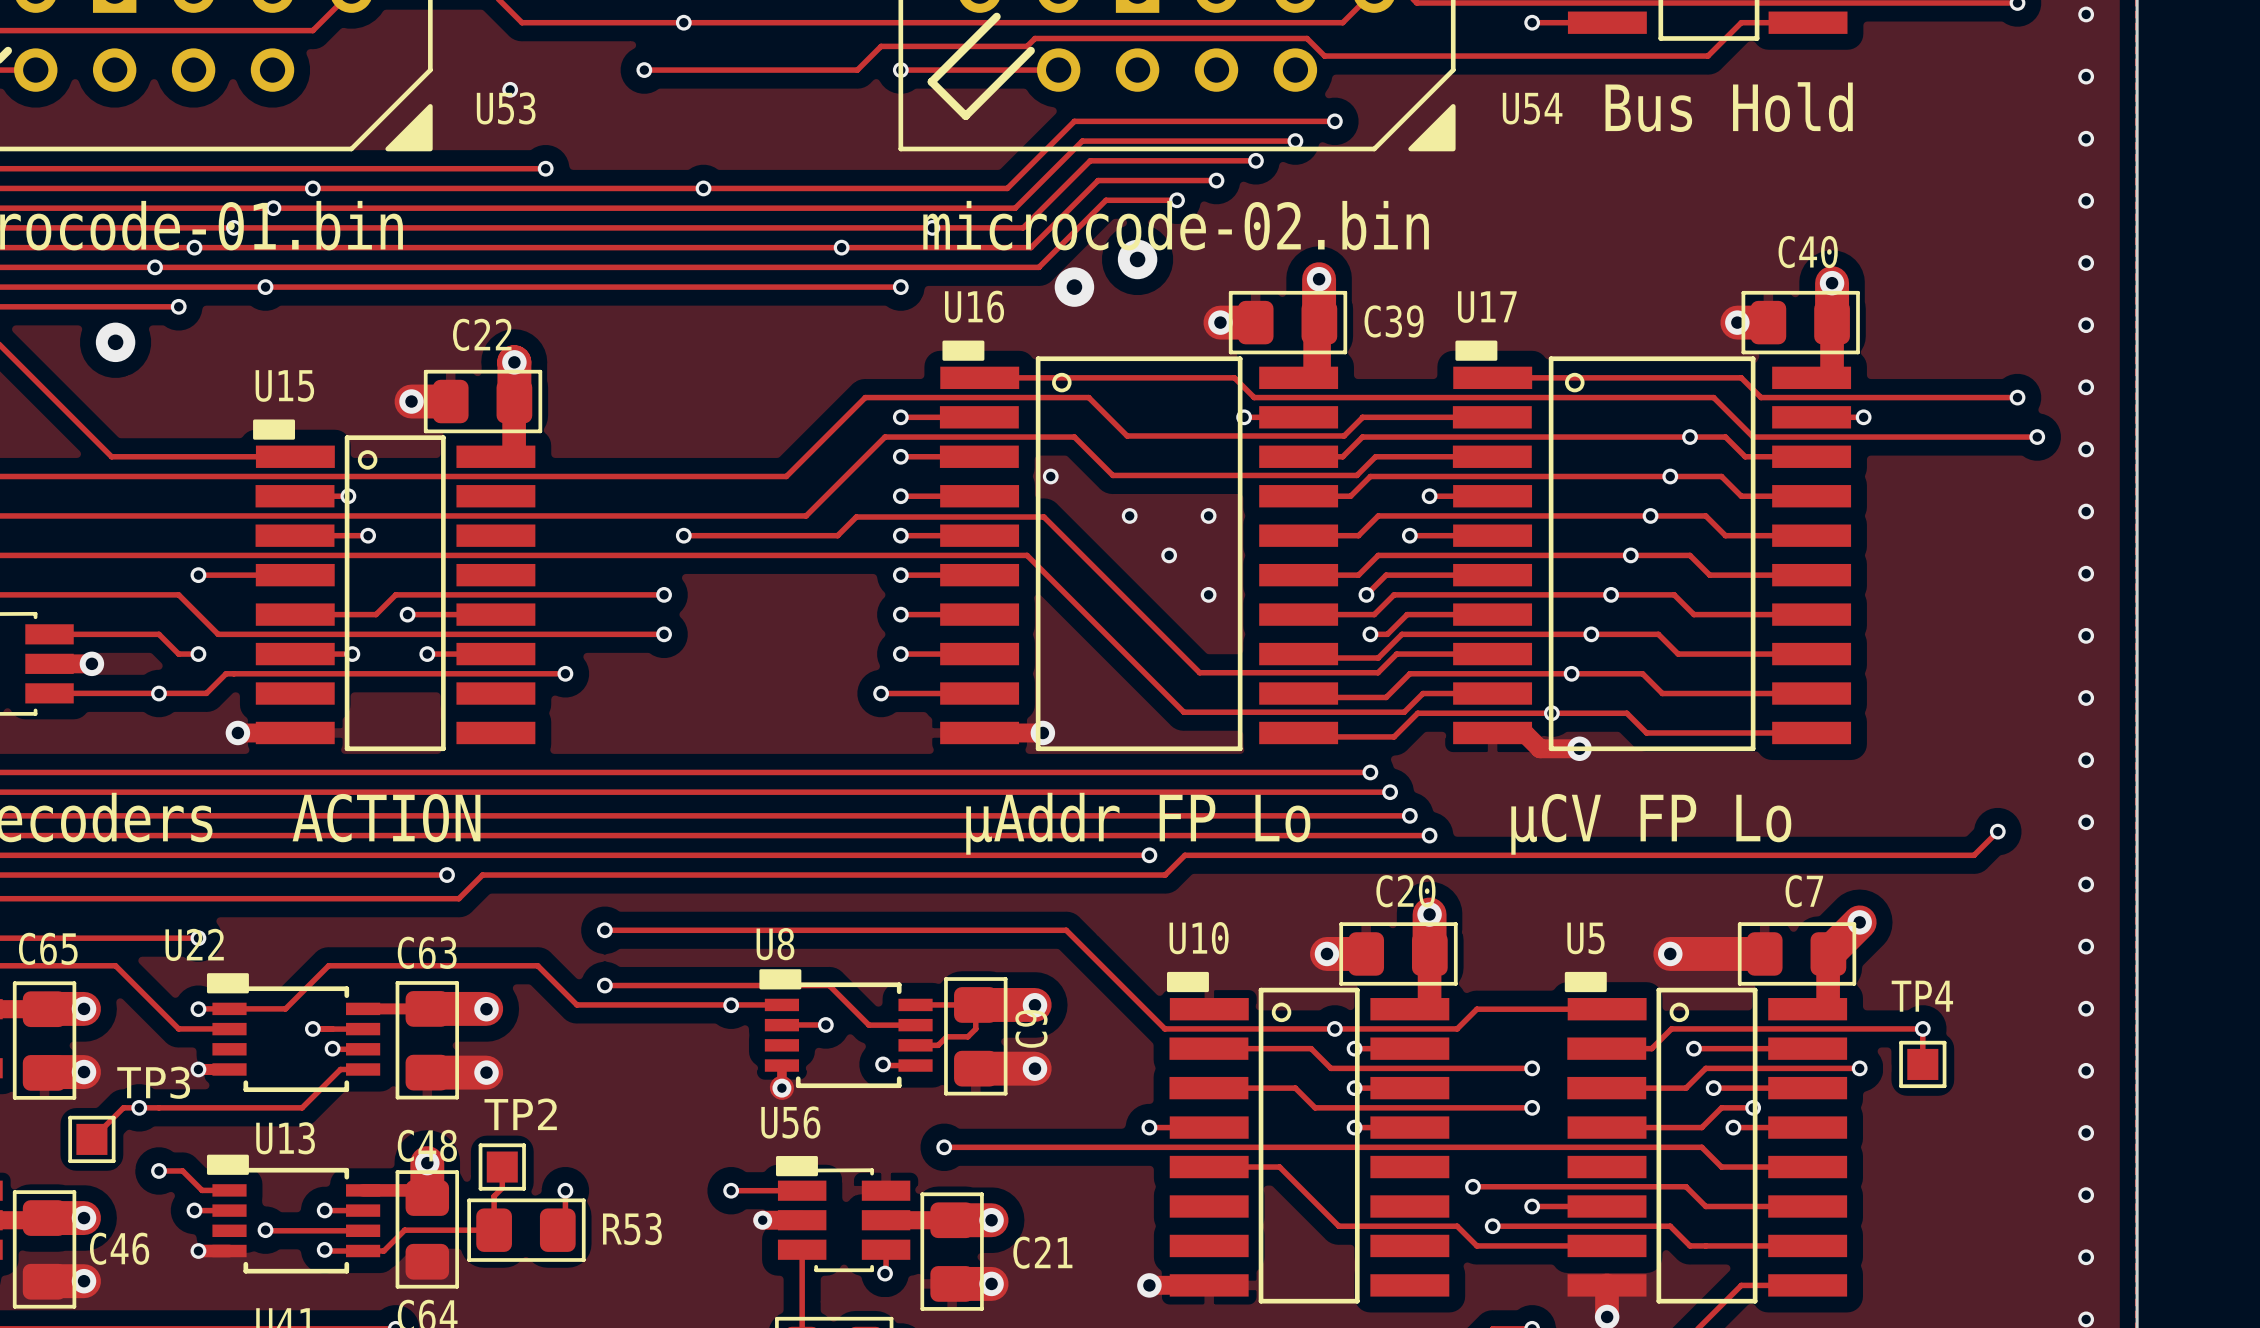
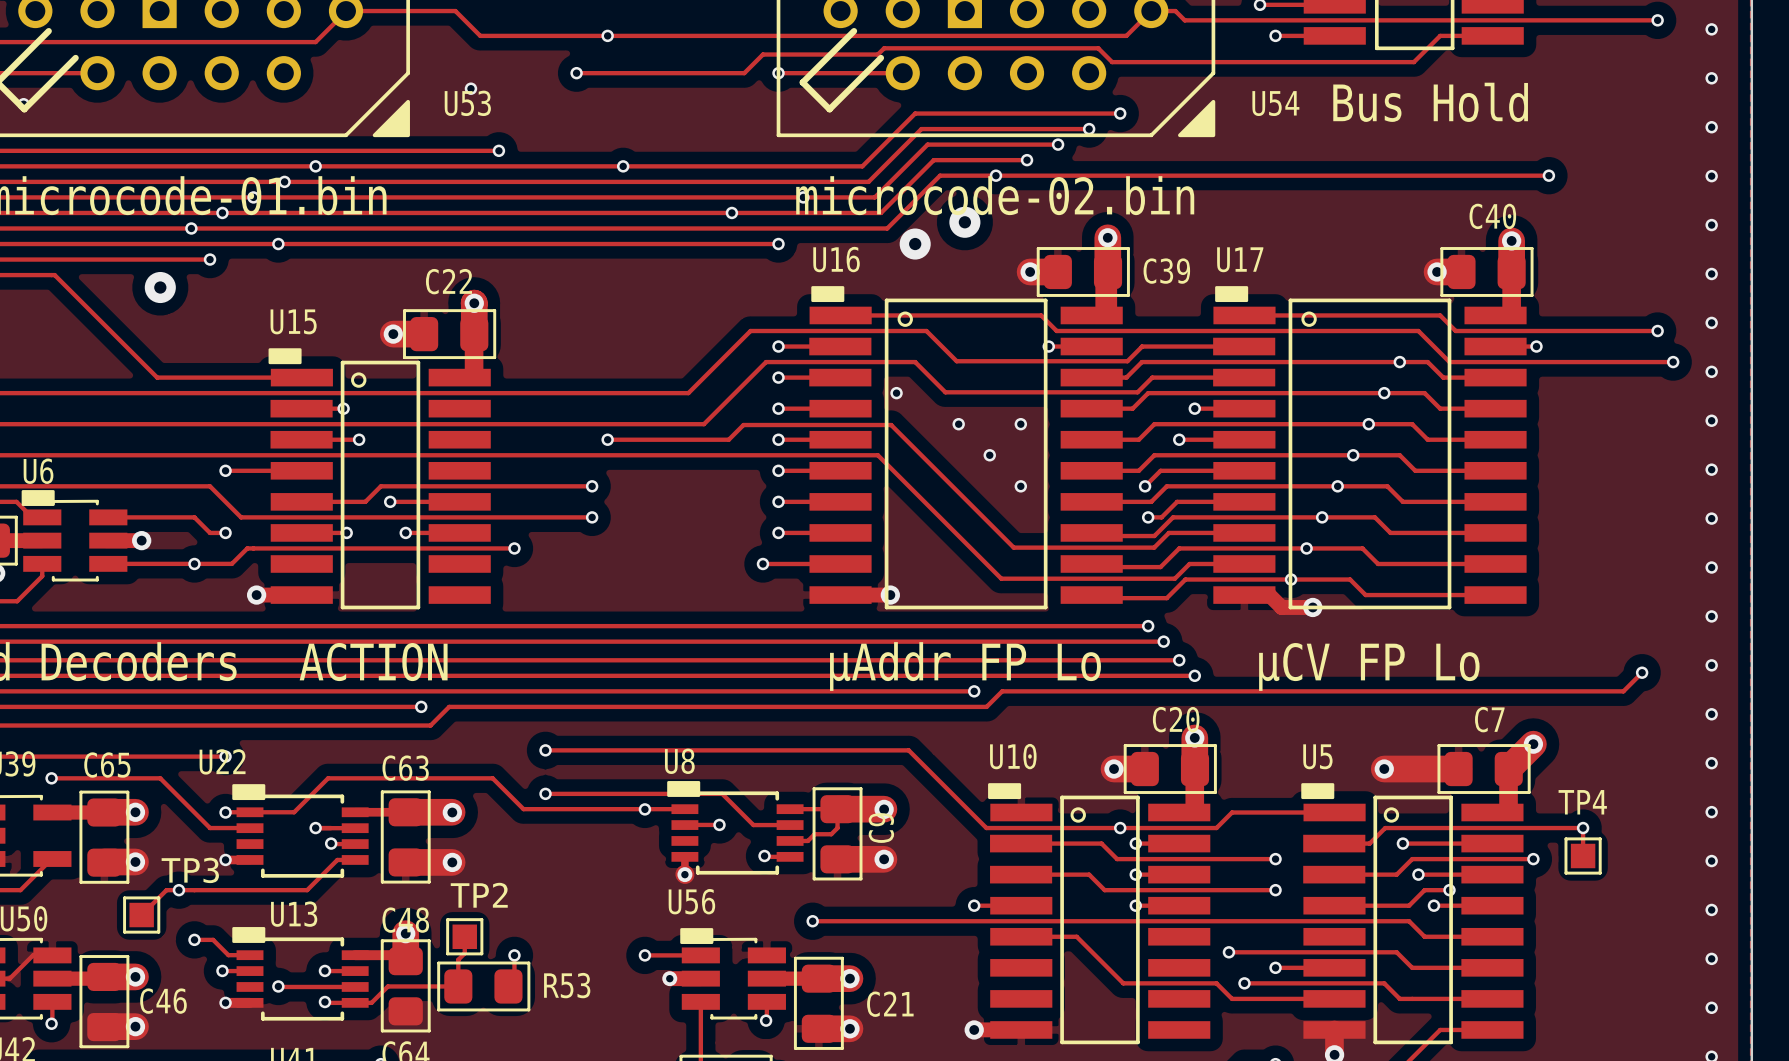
track: none -> (995, 175) (1548, 175)
via: none -> (1548, 175)

